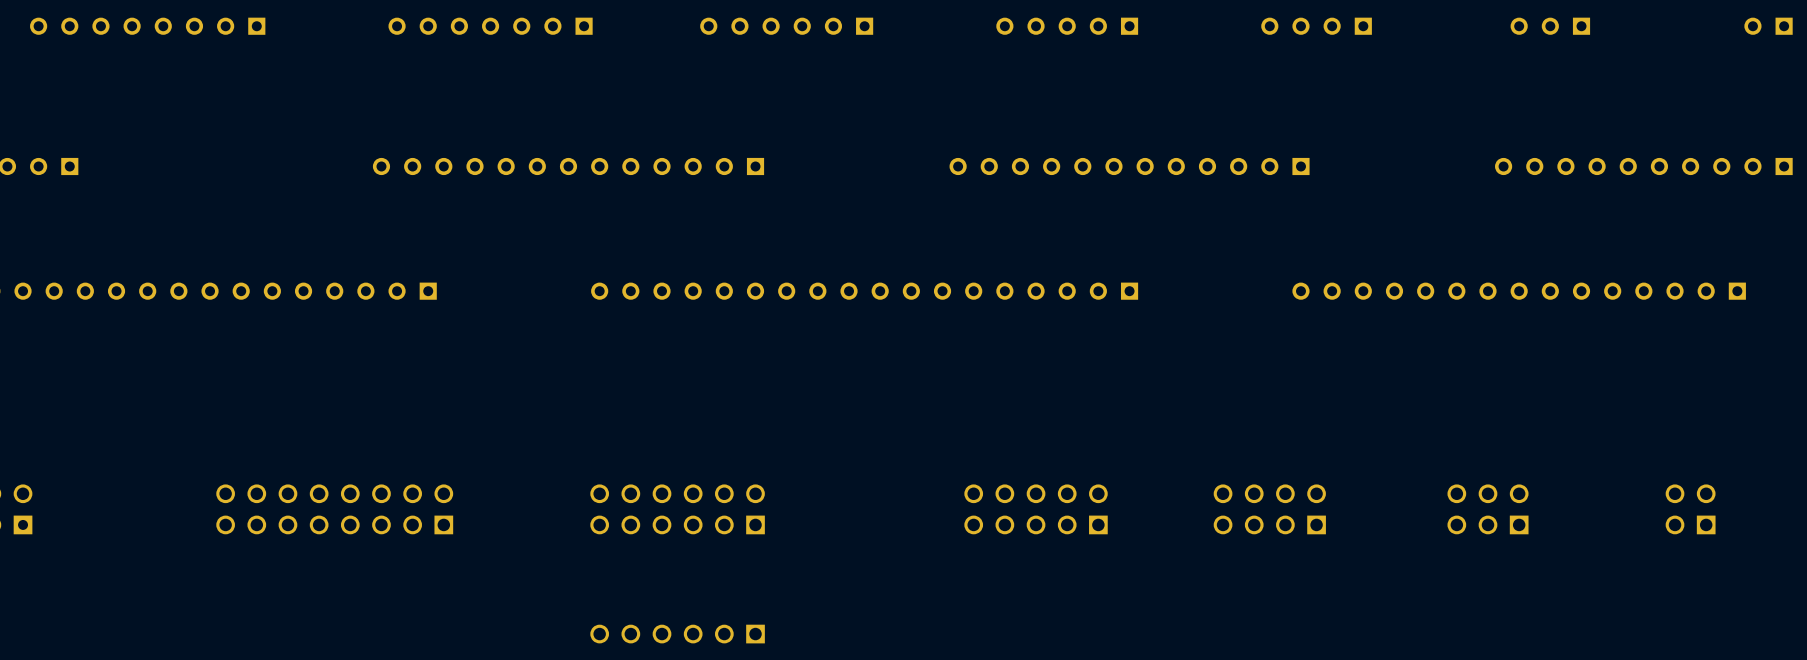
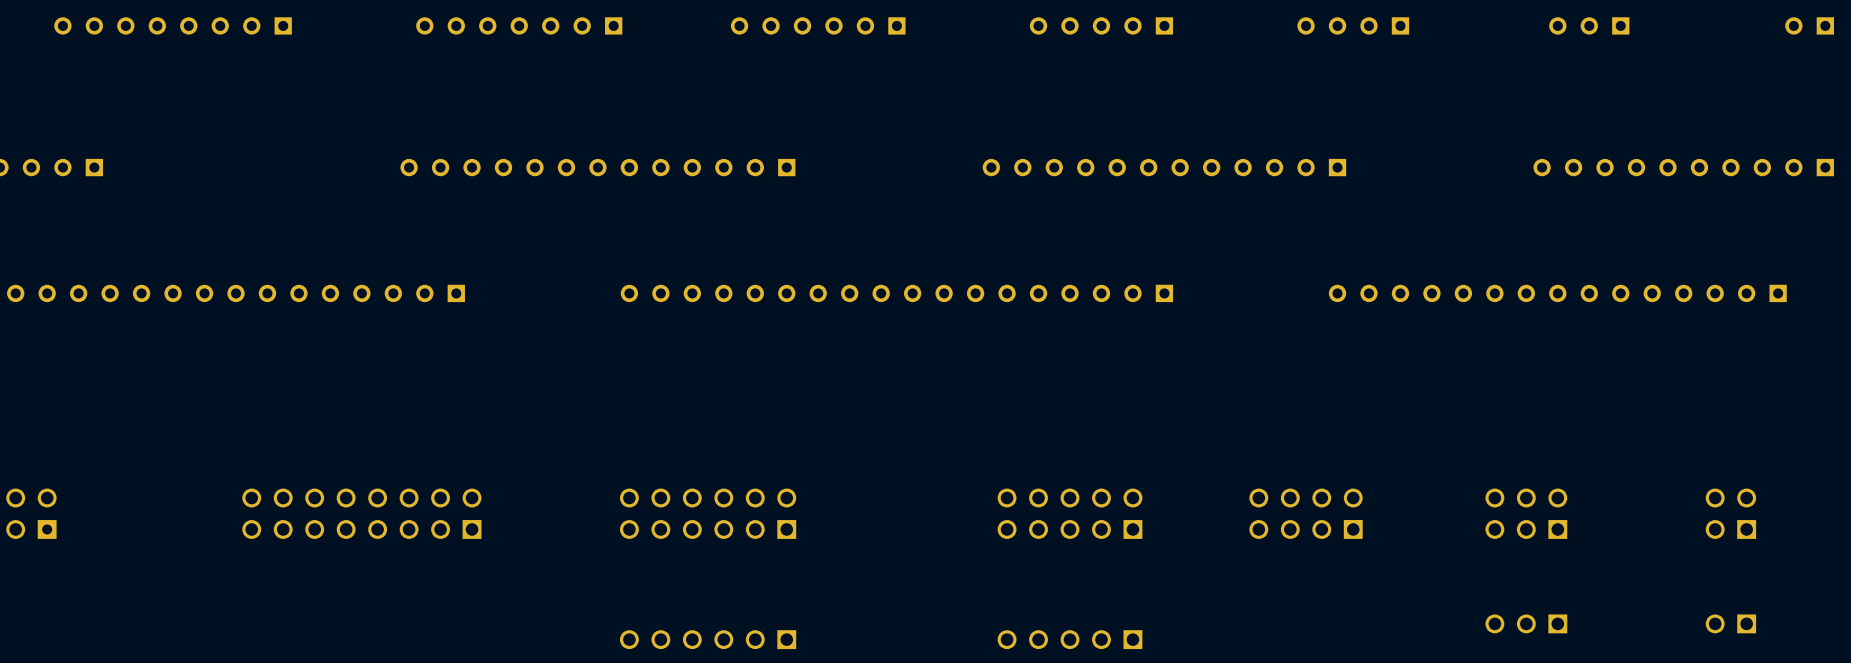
part: none -> (1526, 623)
part: none -> (1730, 623)
part: none -> (1070, 639)

